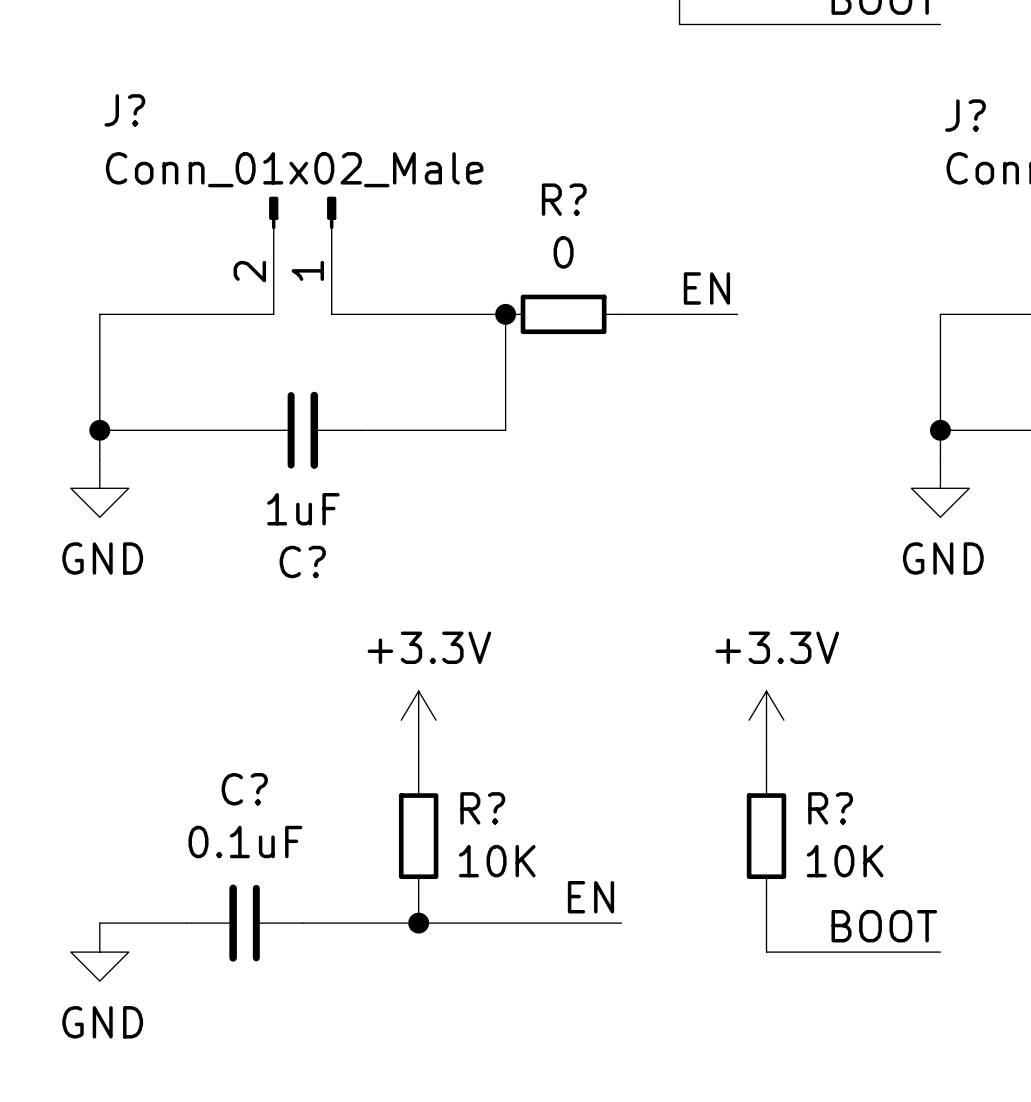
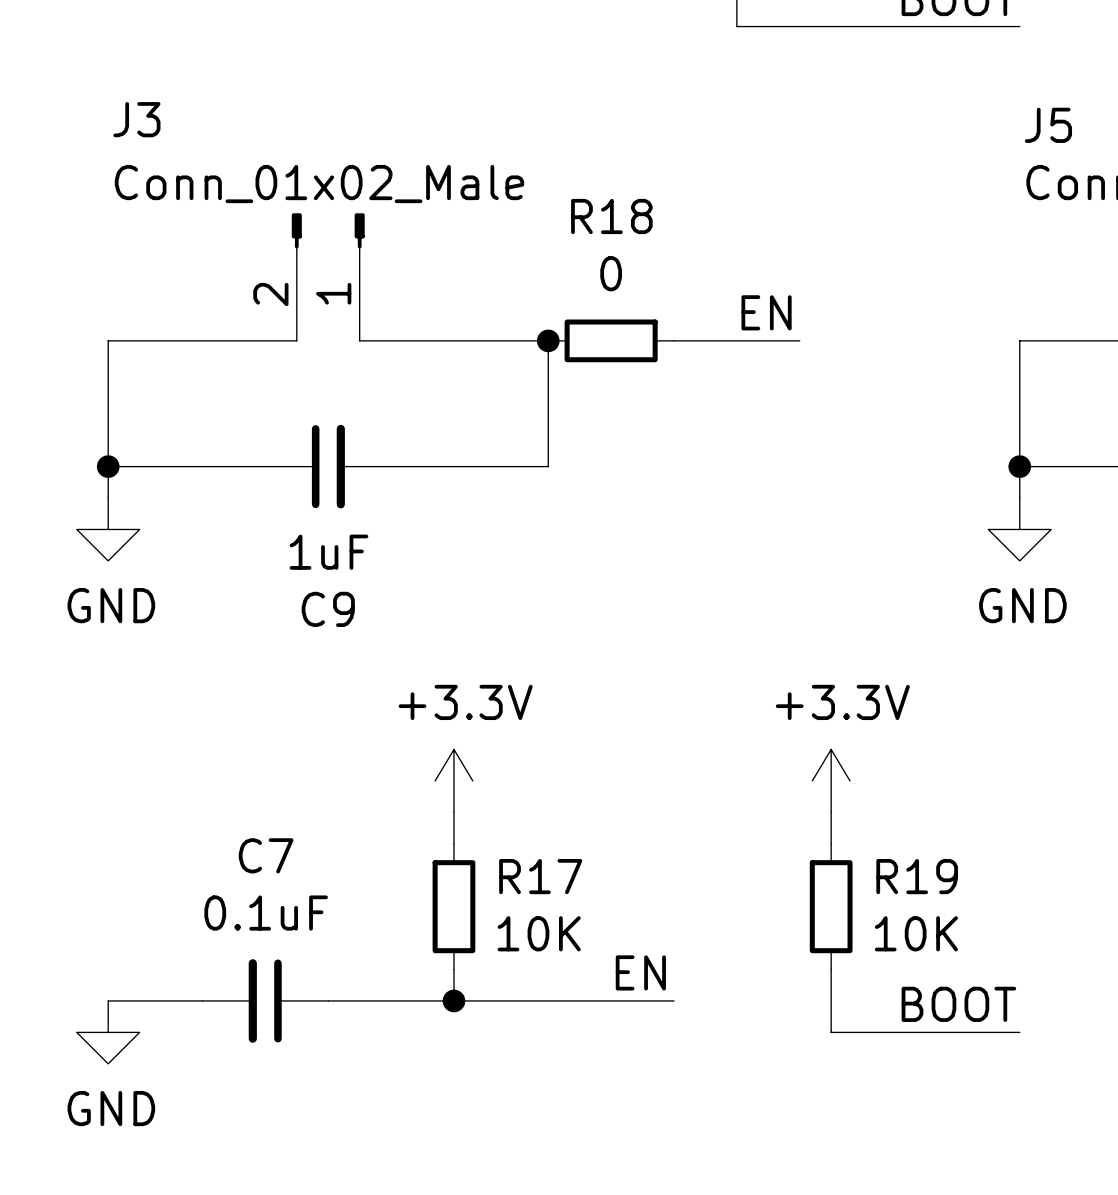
J? name: J? (124, 110) -> J3 (136, 119)
J? name: J? (965, 115) -> J5 (1048, 125)
R? name: R? (564, 199) -> R18 (611, 216)
C? name: C? (302, 561) -> C9 (328, 609)
C? name: C? (244, 789) -> C7 (266, 855)
R? name: R? (482, 808) -> R17 (540, 876)
R? name: R? (830, 808) -> R19 (917, 876)

